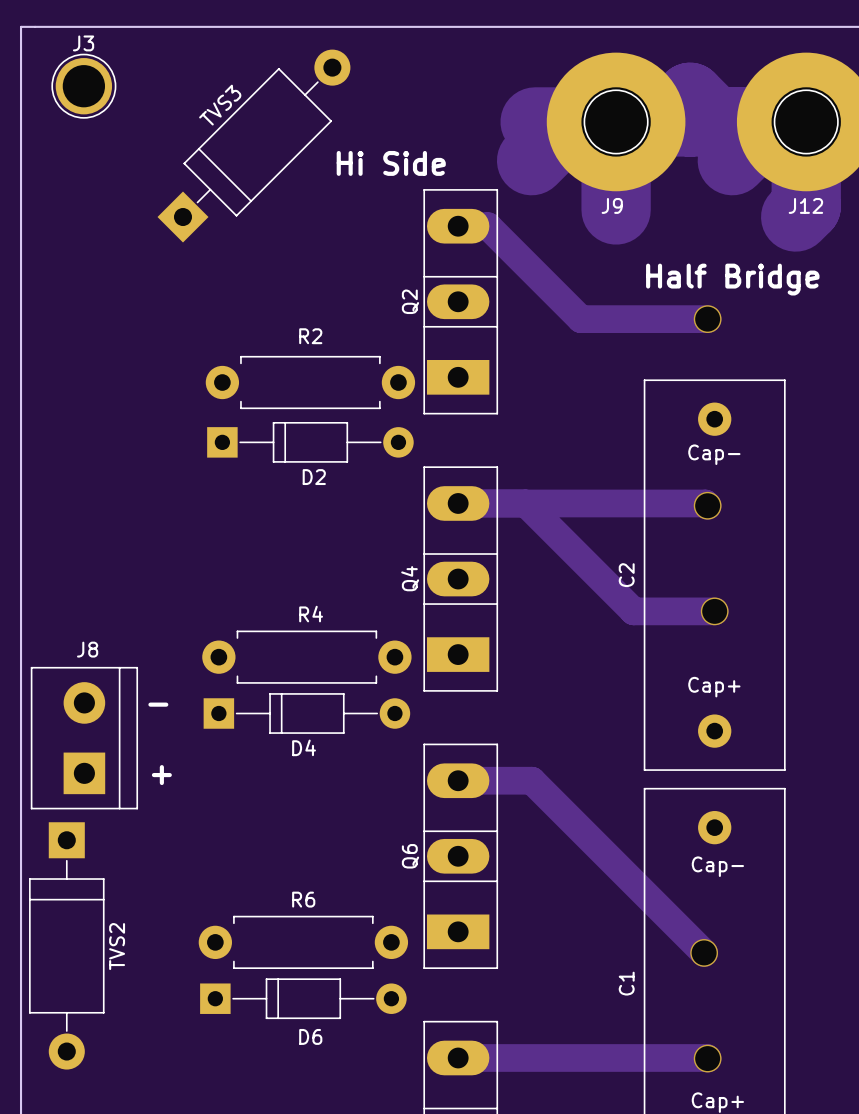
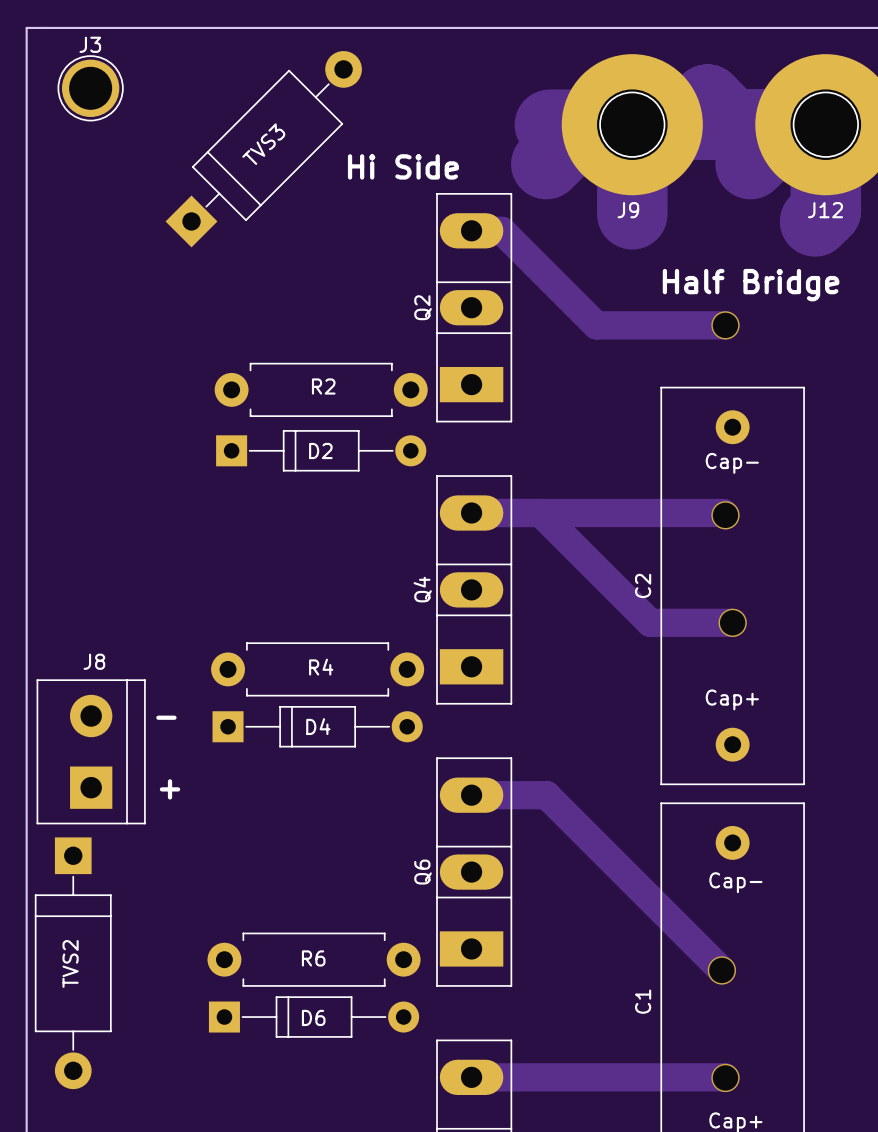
TVS3 name position: TVS3 (220, 105) -> TVS3 (263, 144)
R2 name position: R2 (310, 336) -> R2 (323, 386)
D2 name position: D2 (314, 477) -> D2 (320, 451)
R4 name position: R4 (311, 614) -> R4 (321, 667)
D4 name position: D4 (304, 747) -> D4 (318, 726)
R6 name position: R6 (303, 899) -> R6 (313, 958)
TVS2 name position: TVS2 (117, 946) -> TVS2 (70, 963)
D6 name position: D6 (310, 1036) -> D6 (313, 1017)

